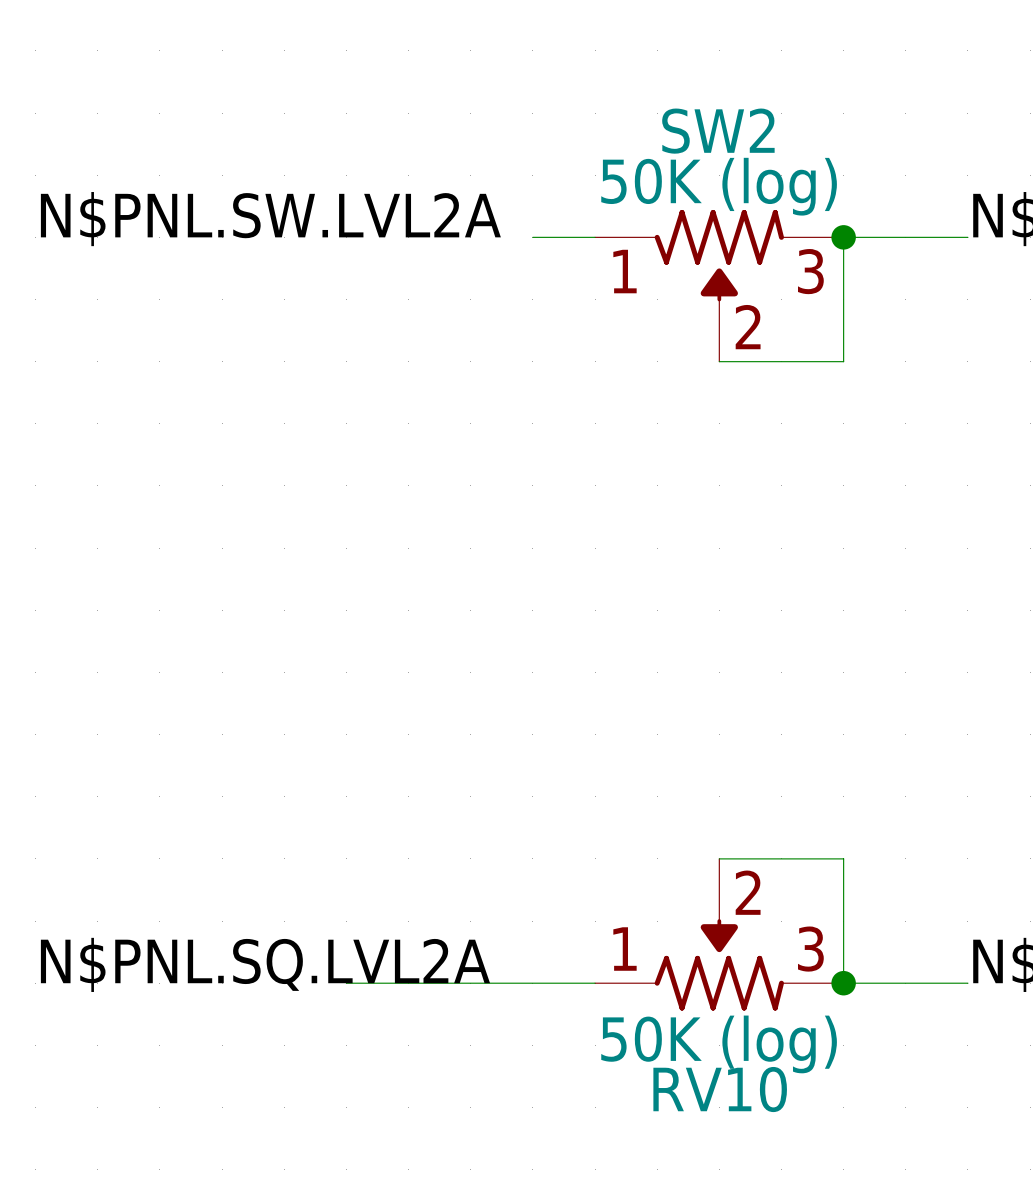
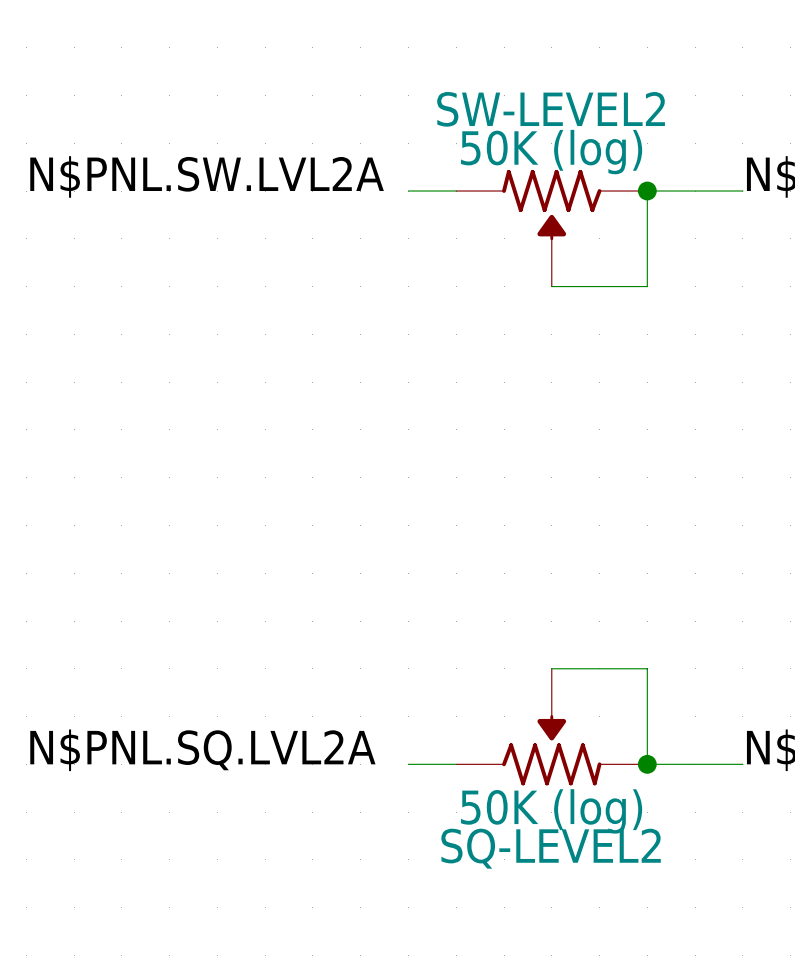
SW2: 50K (log) (719, 285) -> none
SW-LEVEL2: none -> 50K (log) (551, 228)
RV10 text: 2 (748, 892) -> none
RV10 text: 1 (625, 949) -> none
RV10 text: 3 (810, 949) -> none
wire: (346, 983) (532, 983) -> none
RV10 name: RV10 (720, 1089) -> SQ-LEVEL2 (551, 848)

